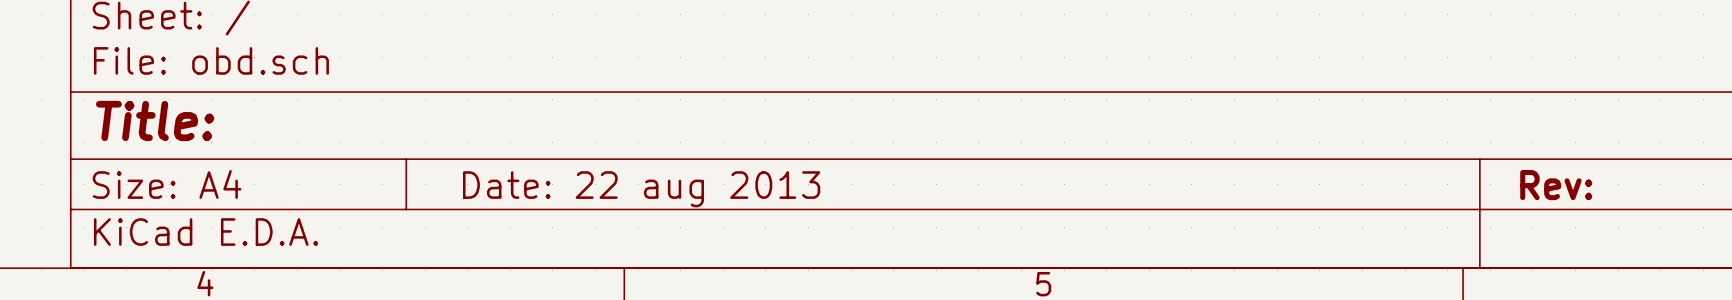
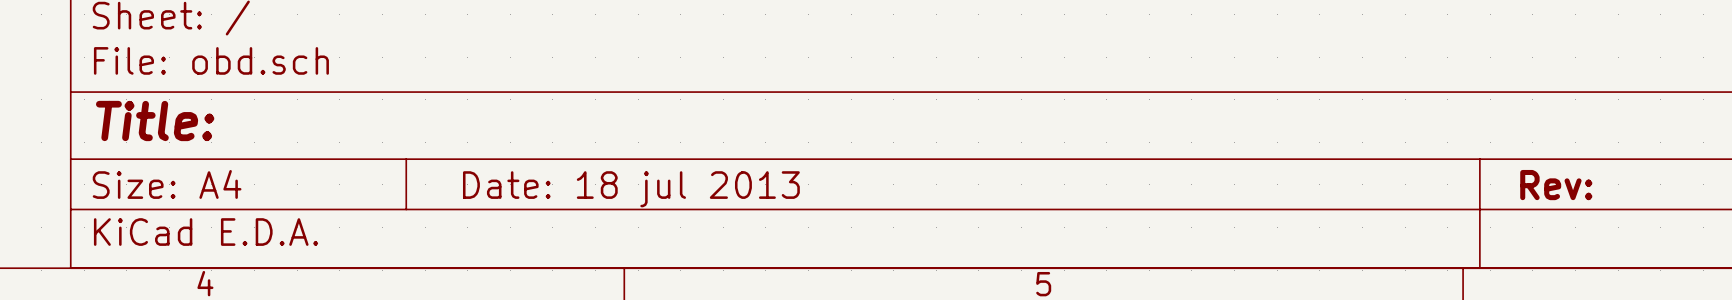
title block: Date: 22 aug 2013 (641, 189) -> Date: 18 jul 2013 (631, 189)

